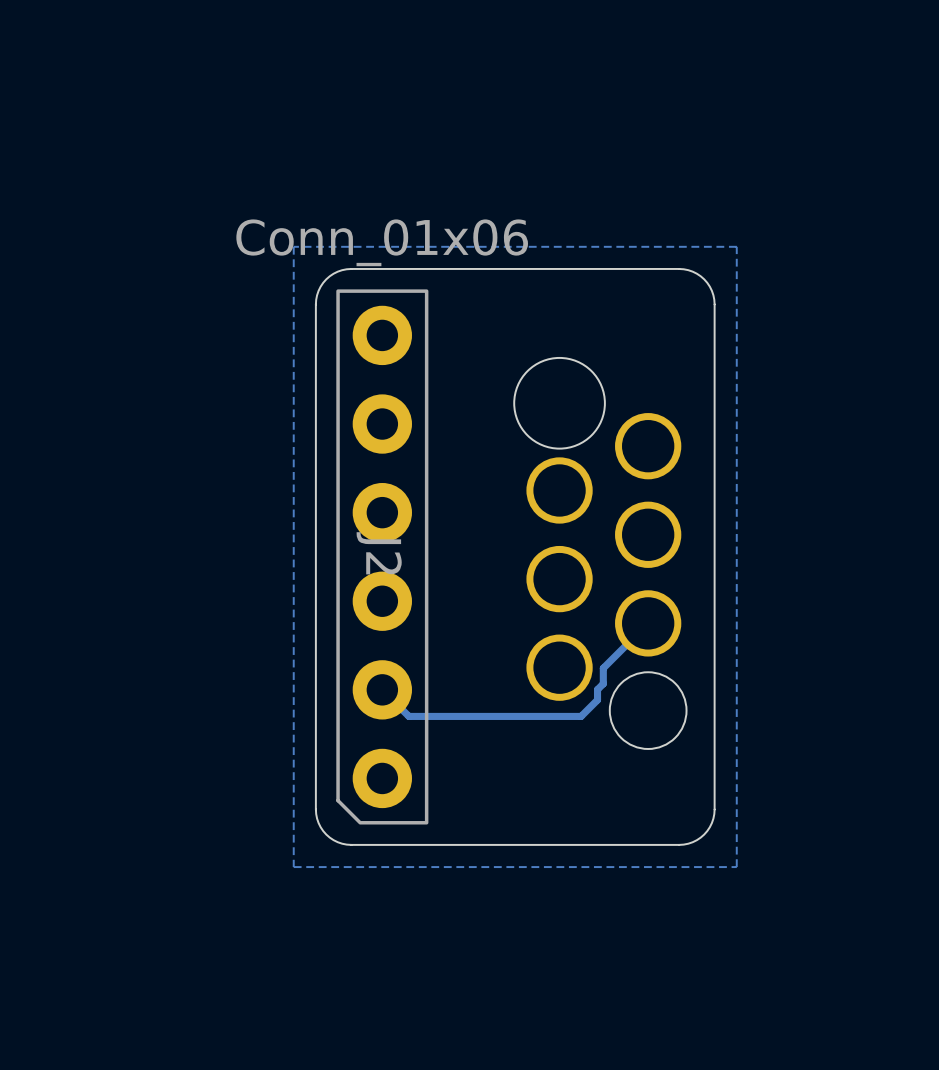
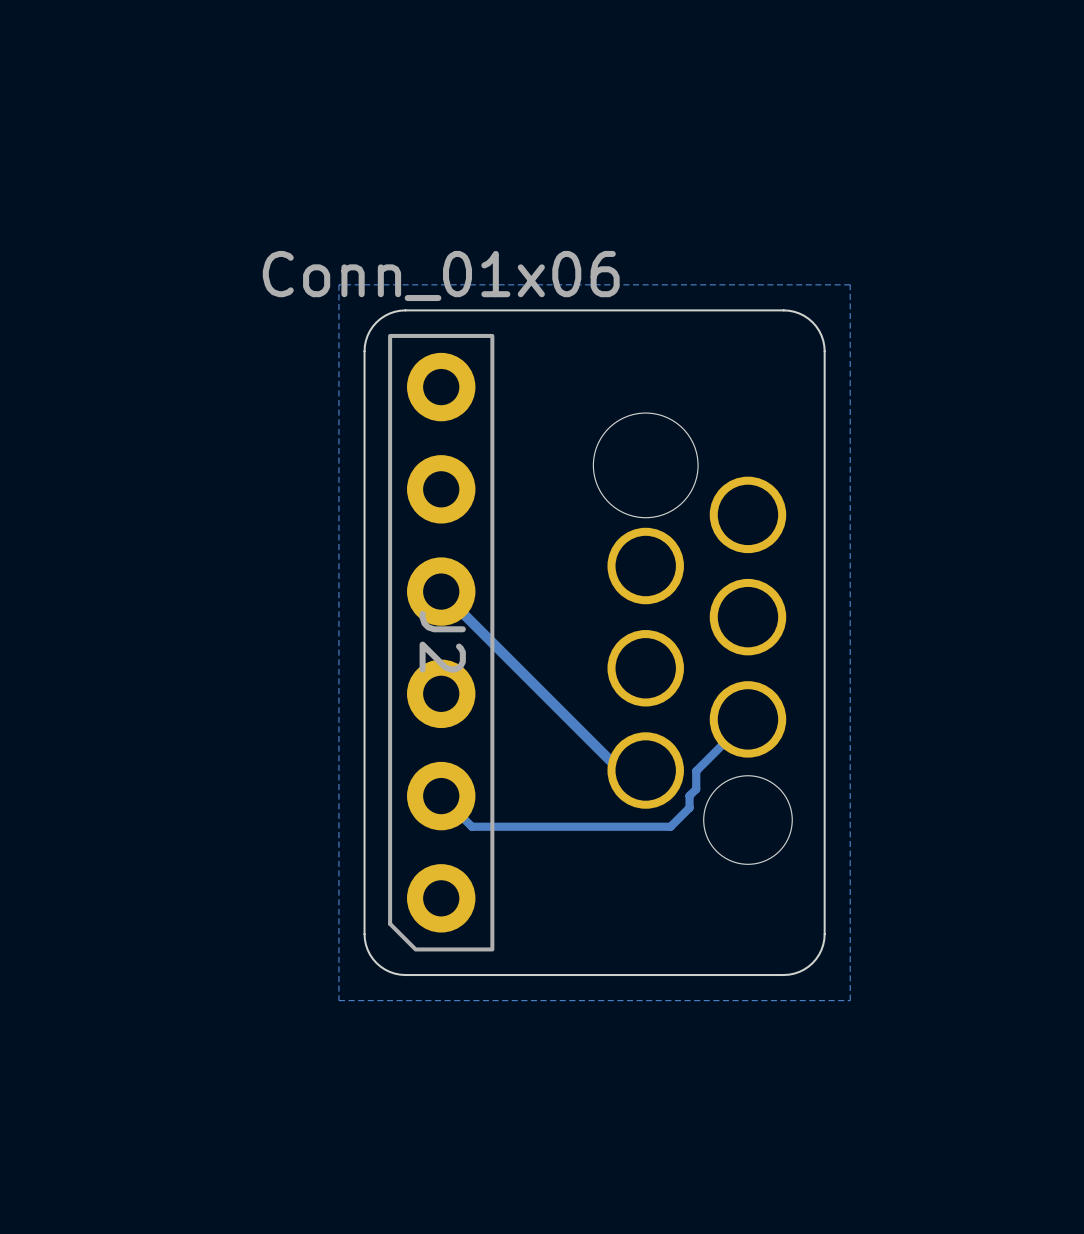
track: none -> (441, 591) (620, 770) (645, 770)

